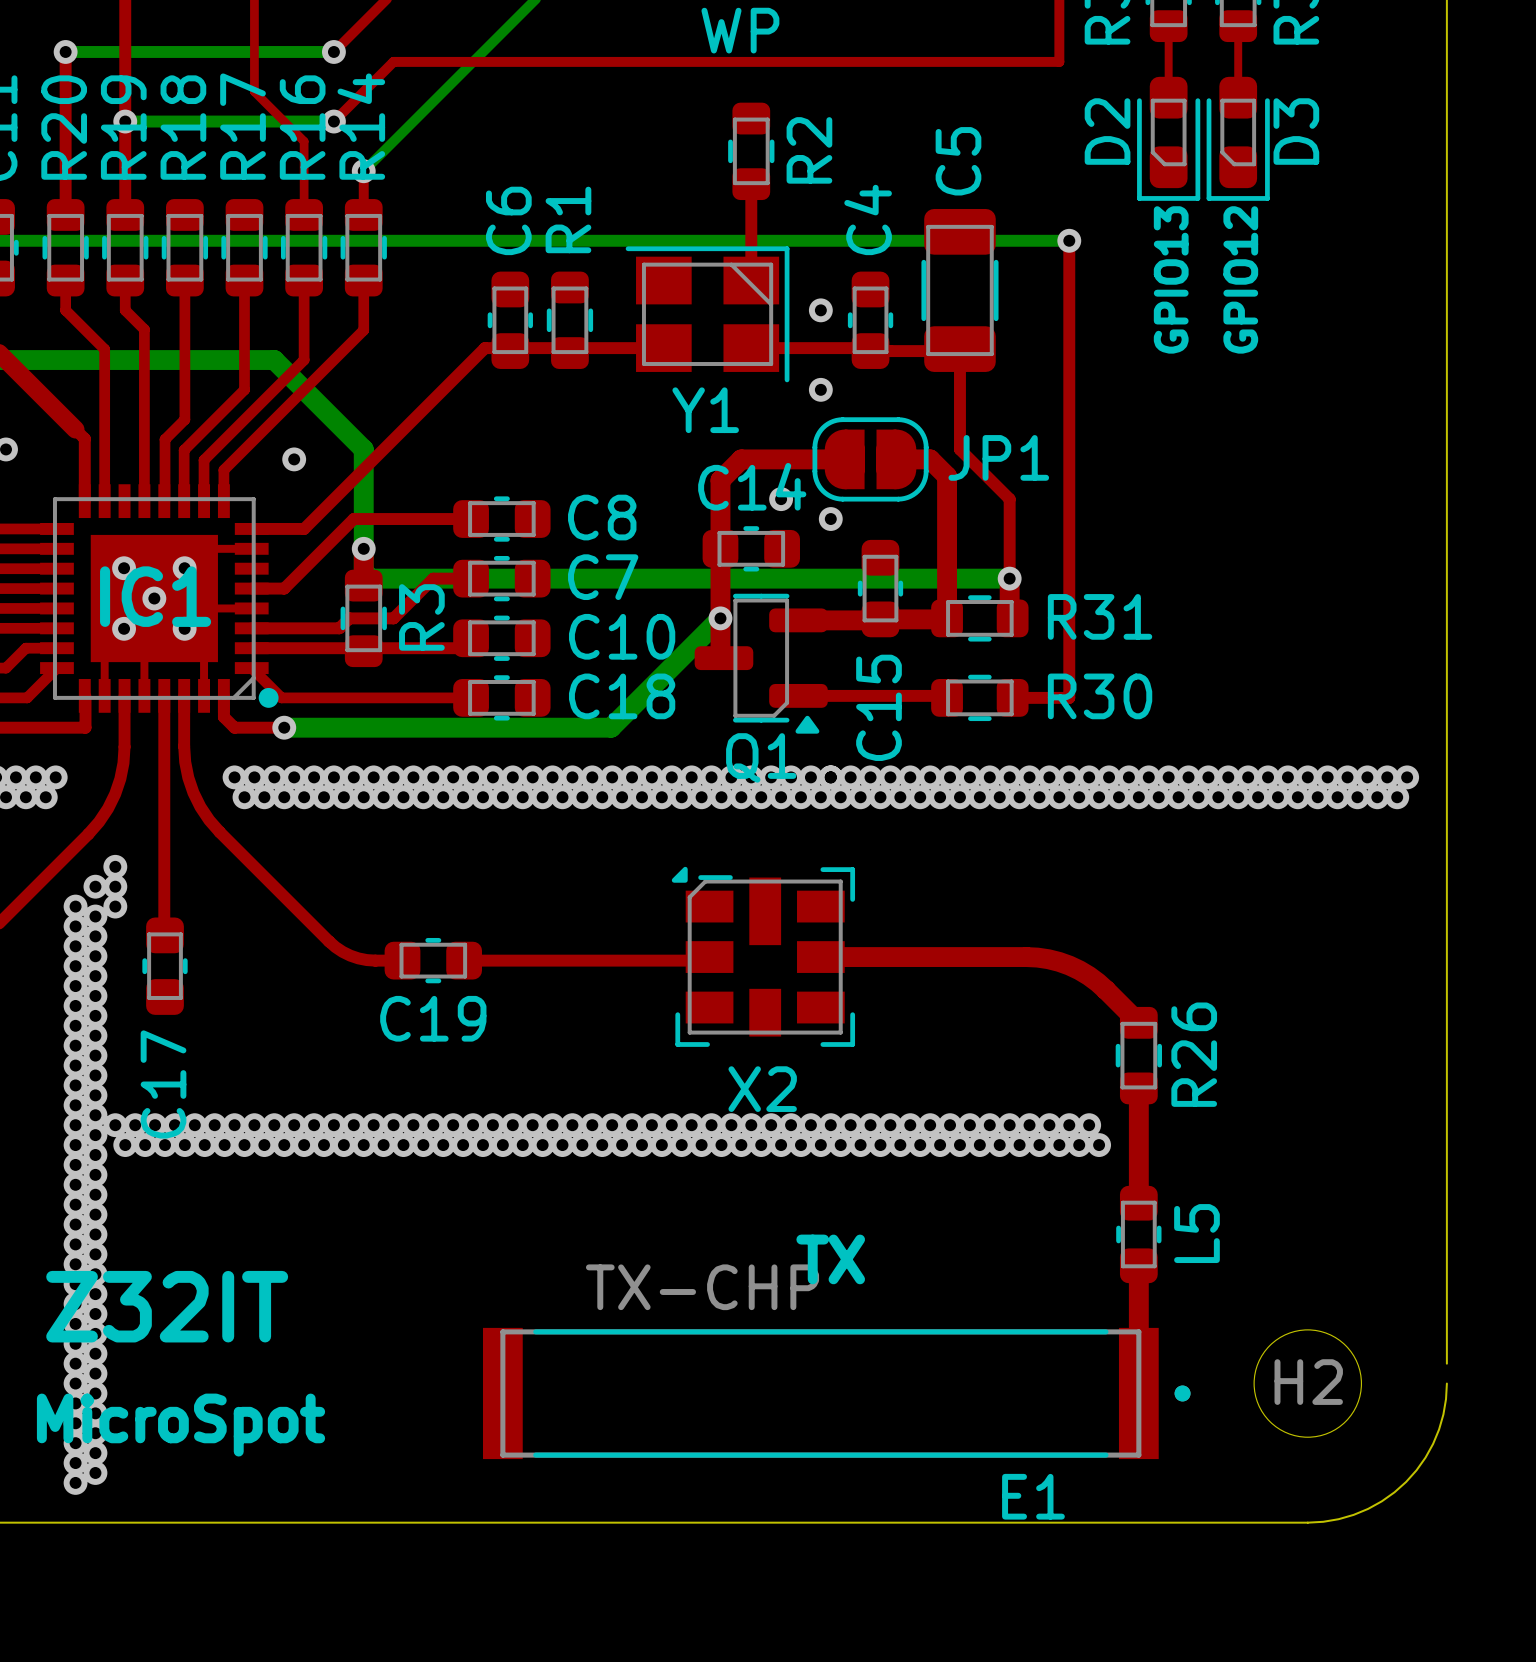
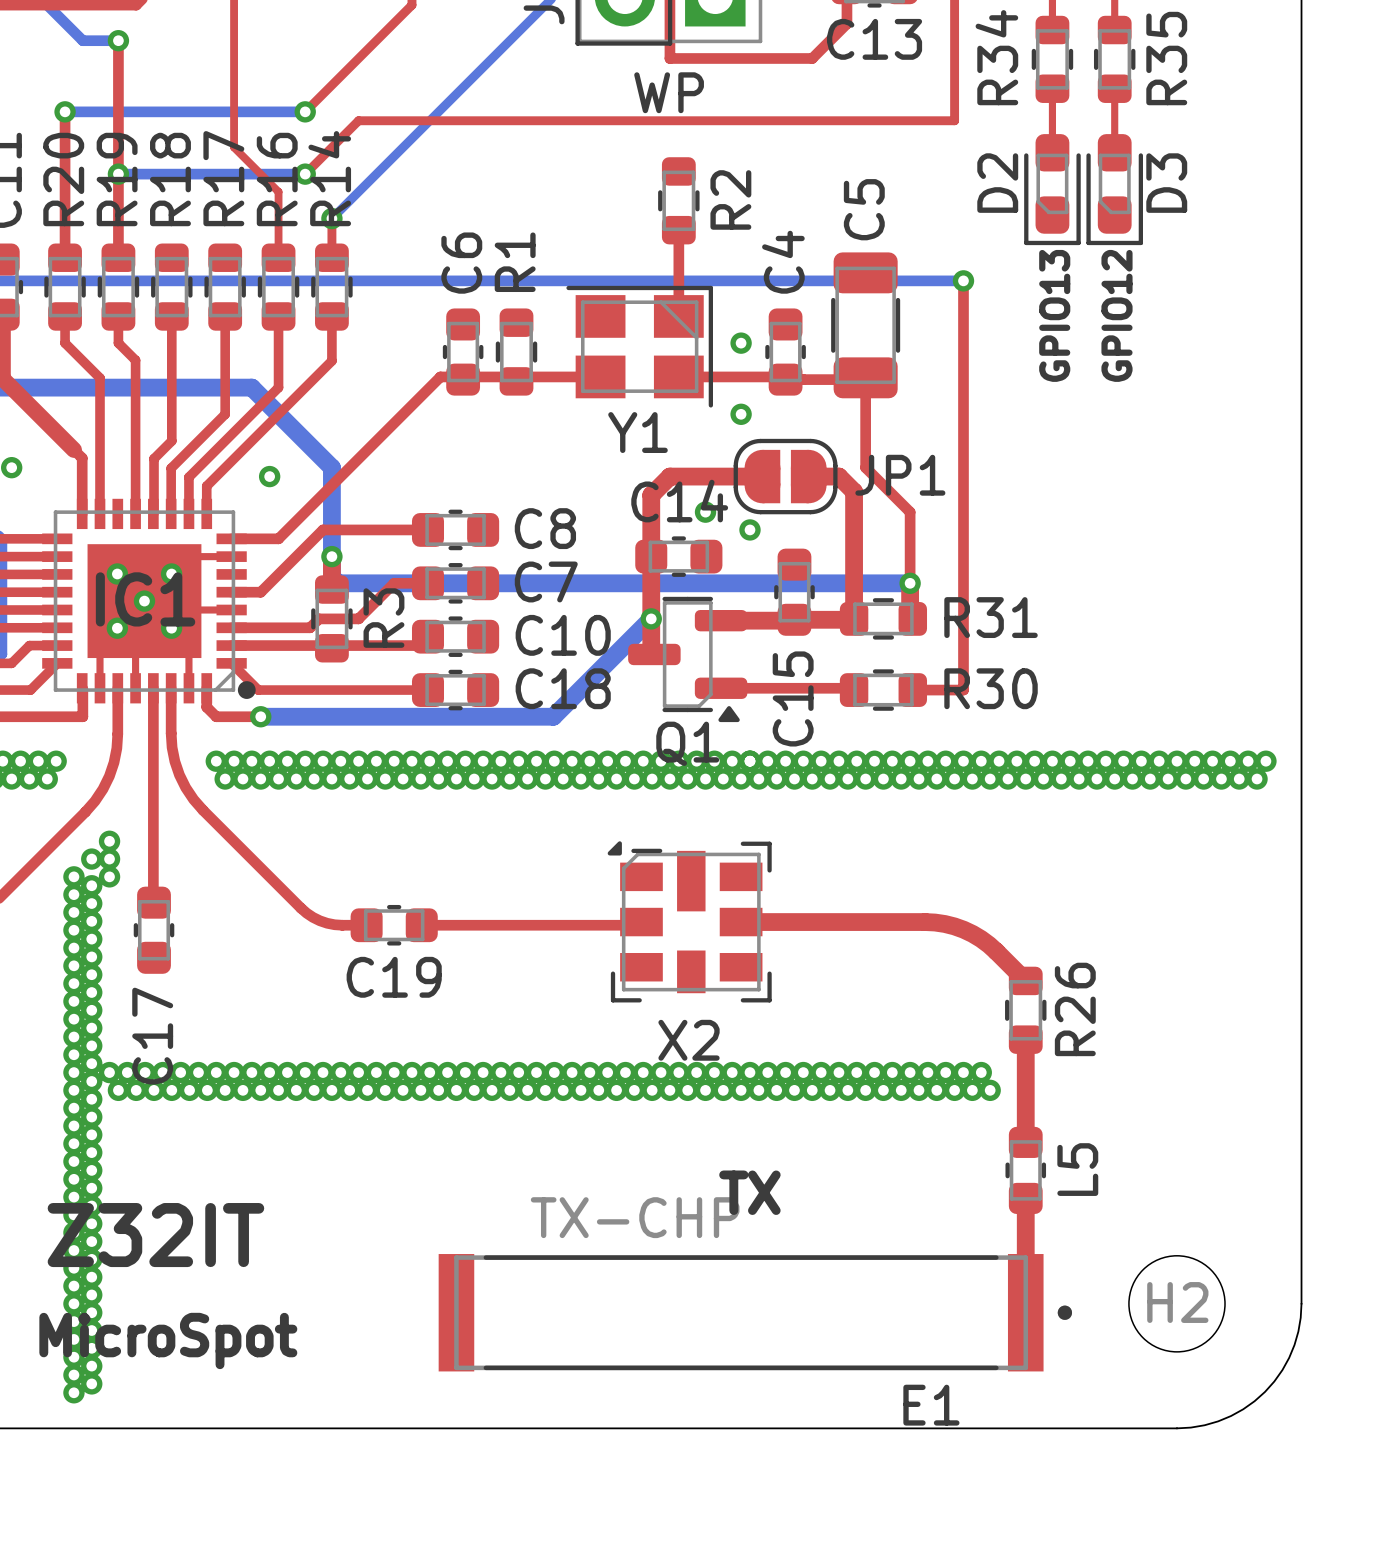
board edge: none -> (1301, 1286) (1301, 1303)

